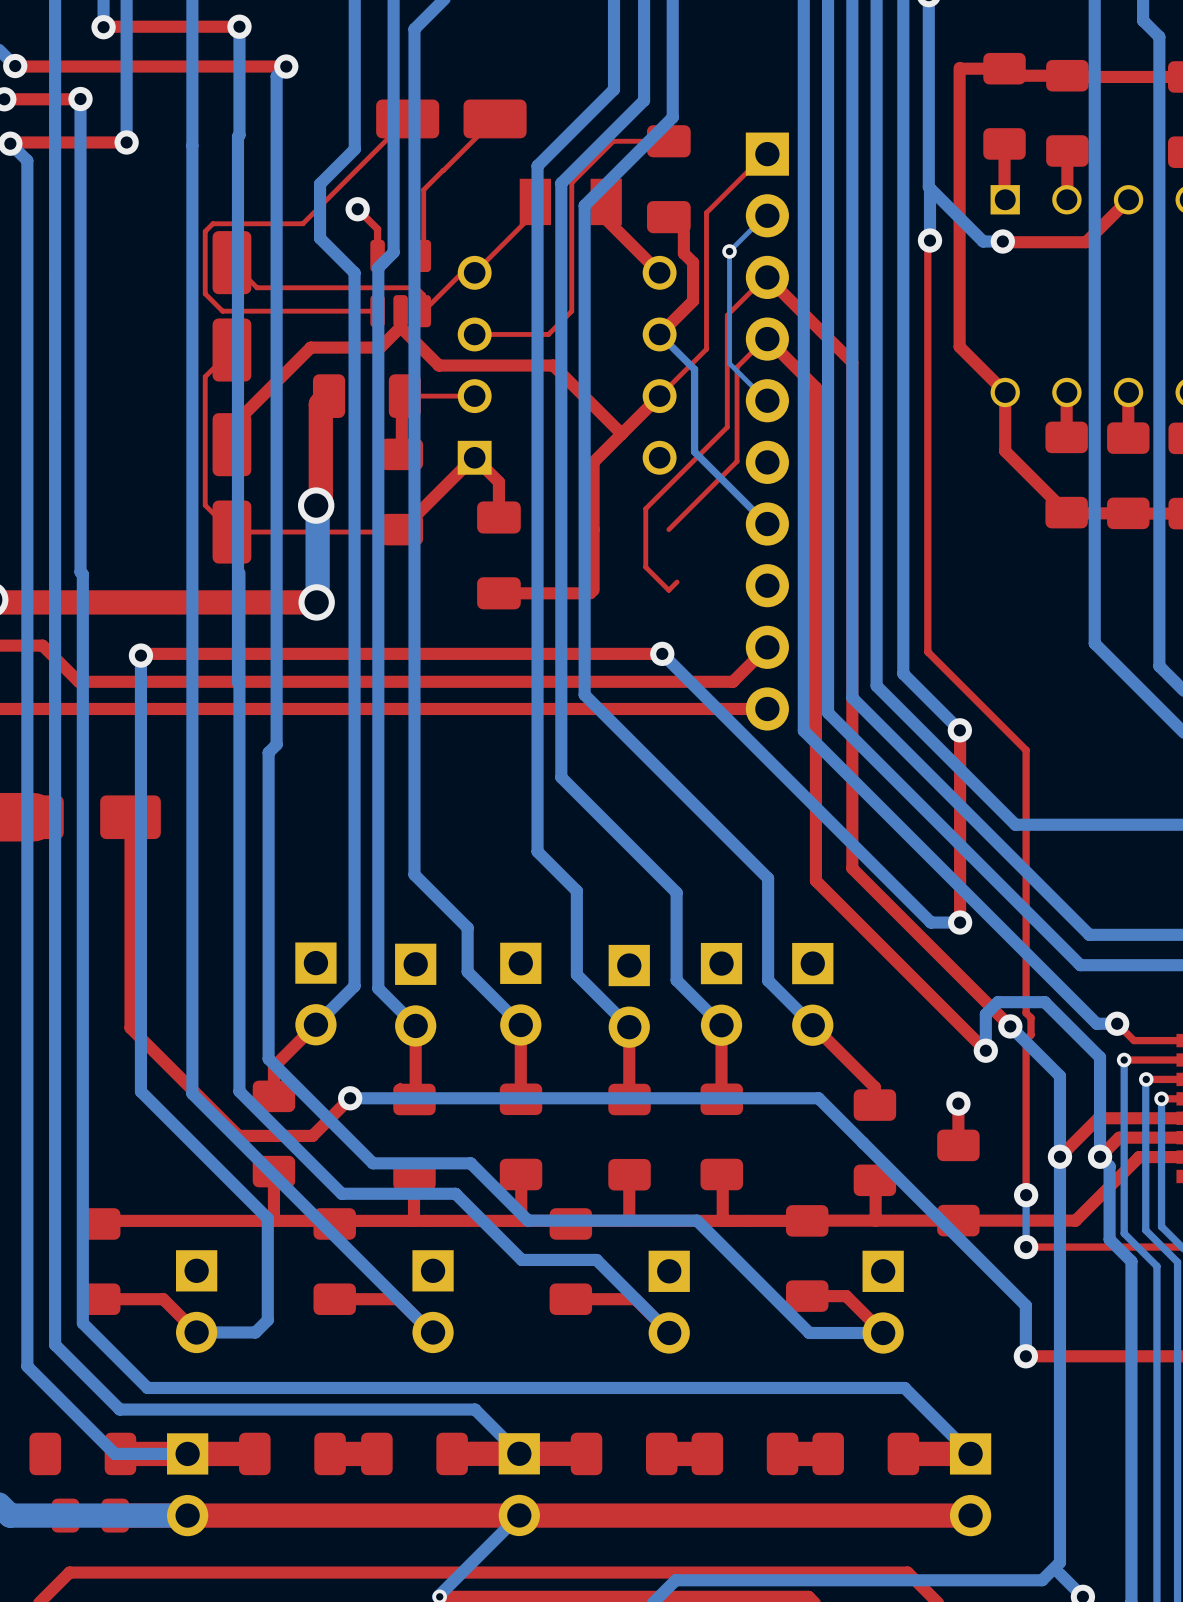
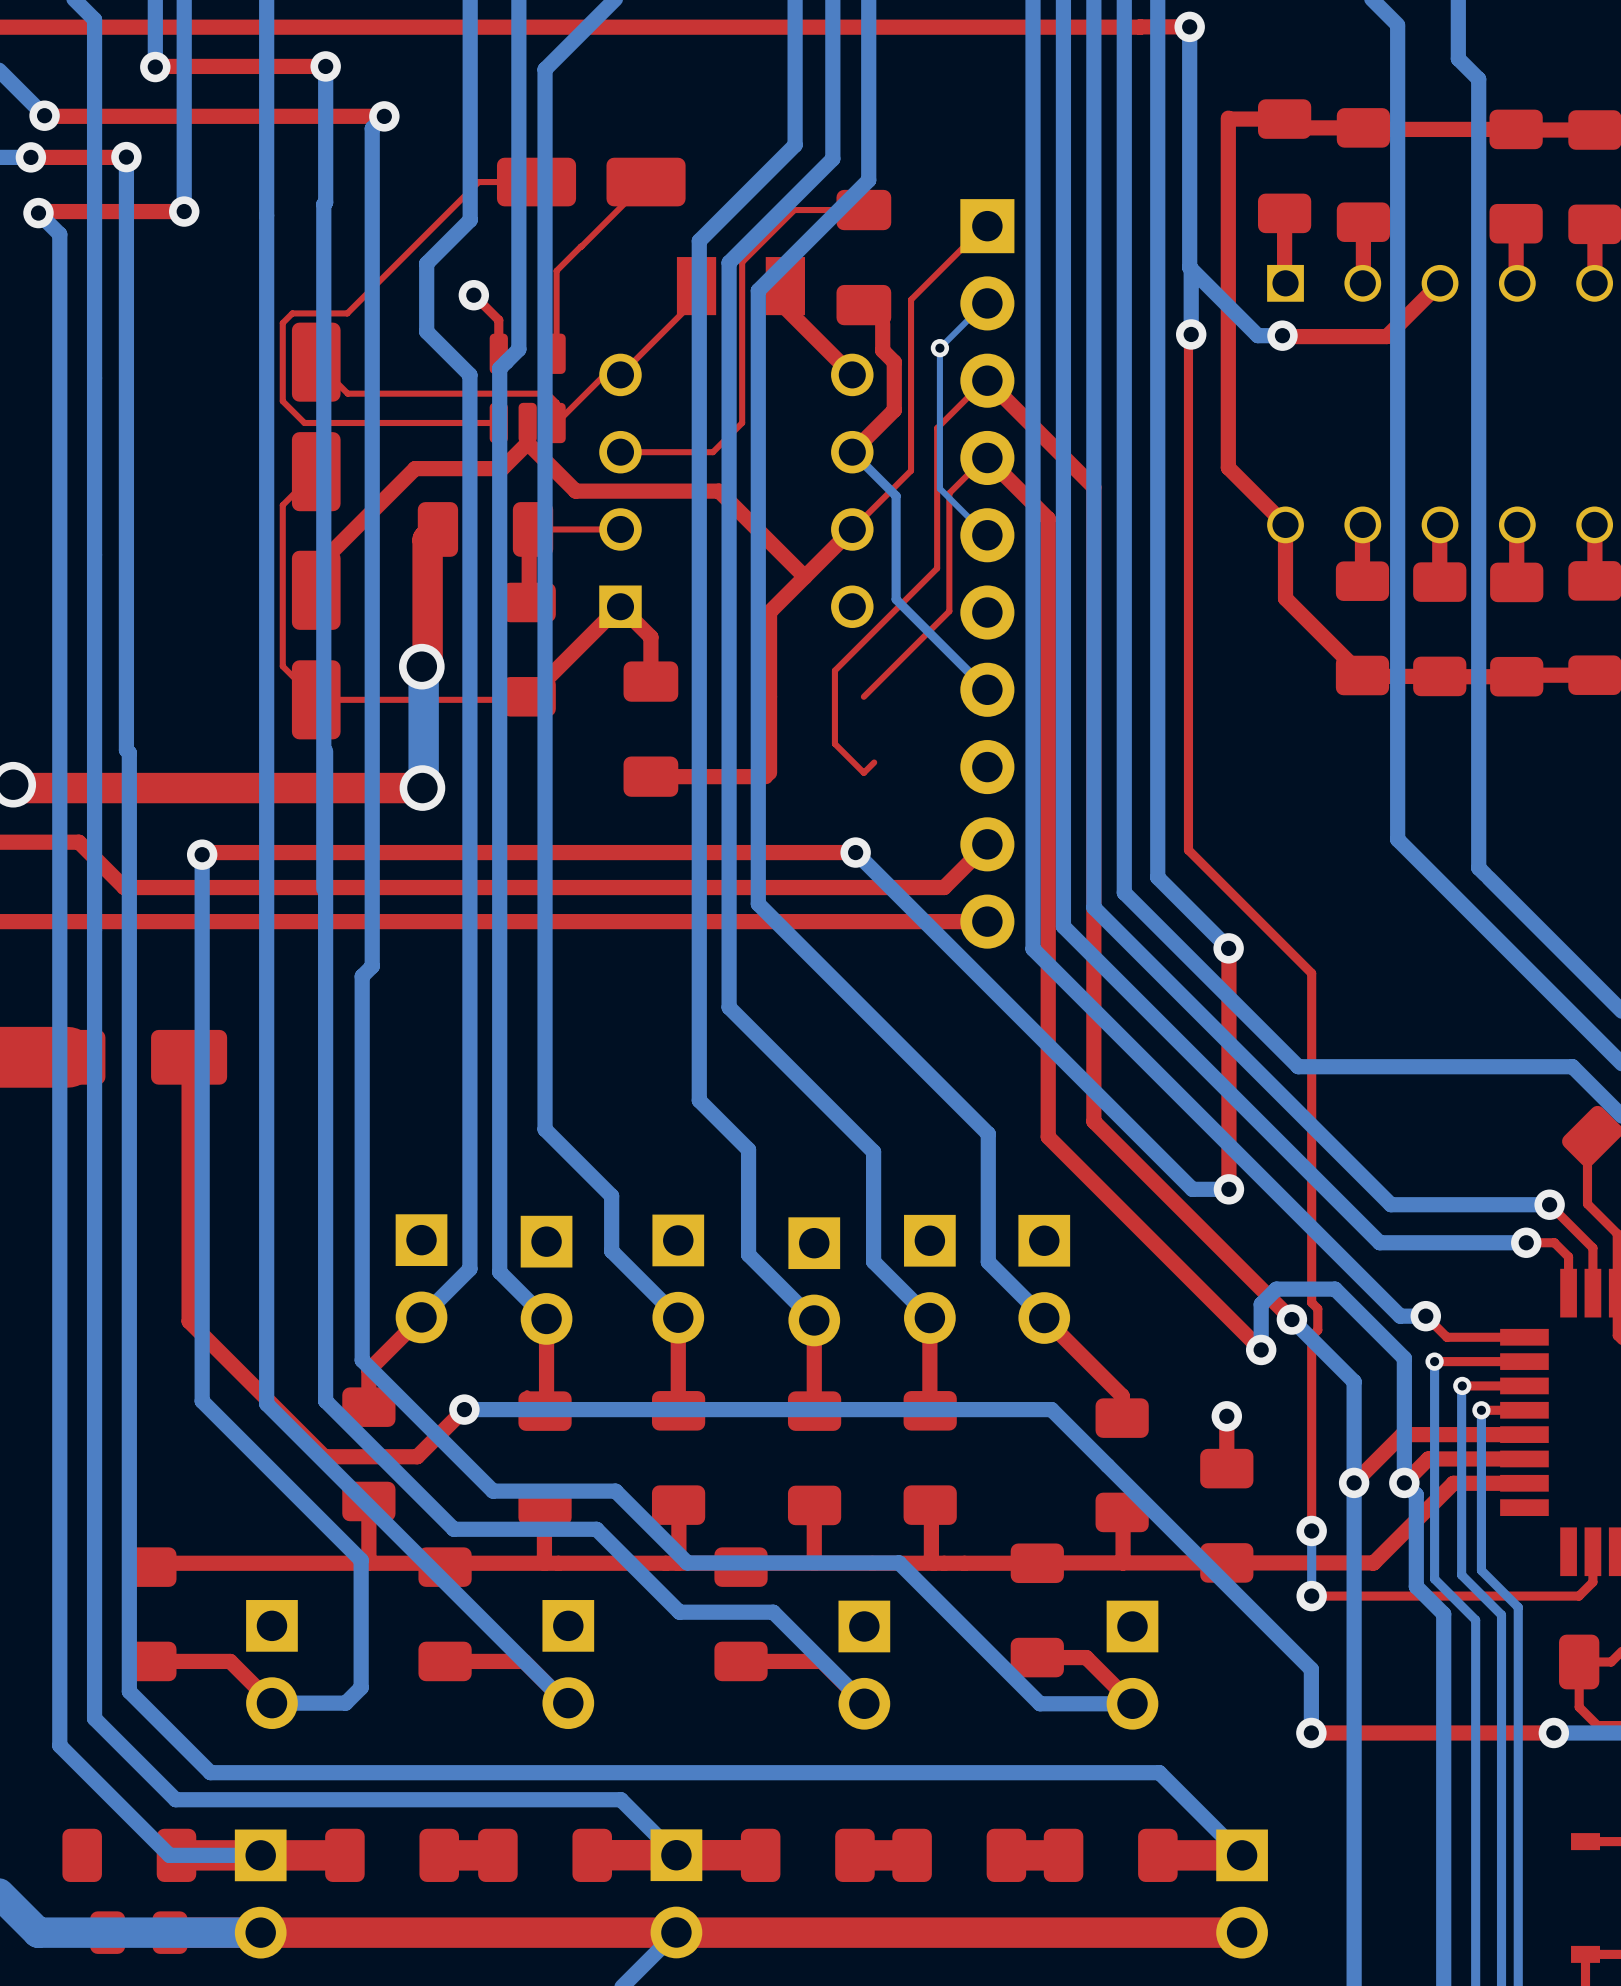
top track: (407, 118) (302, 223) (256, 223) -> (536, 182) (478, 182) (347, 313)

